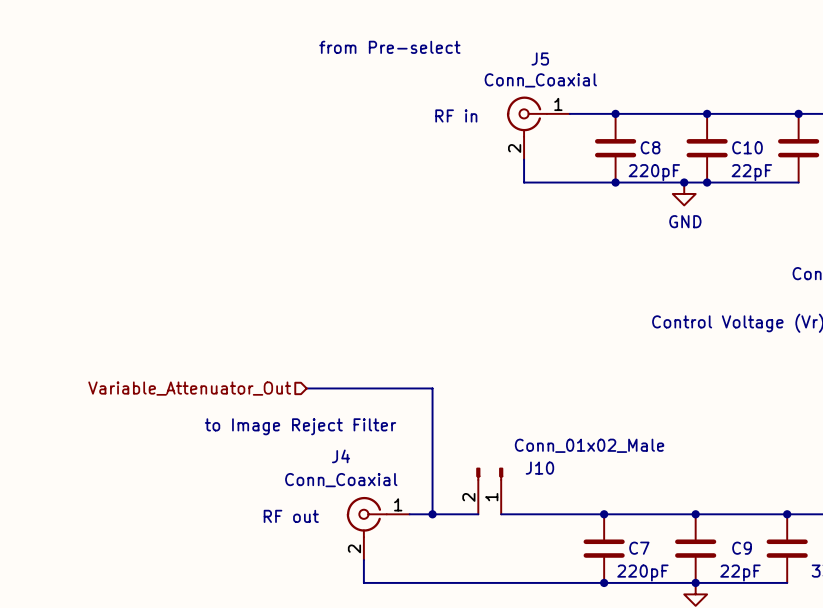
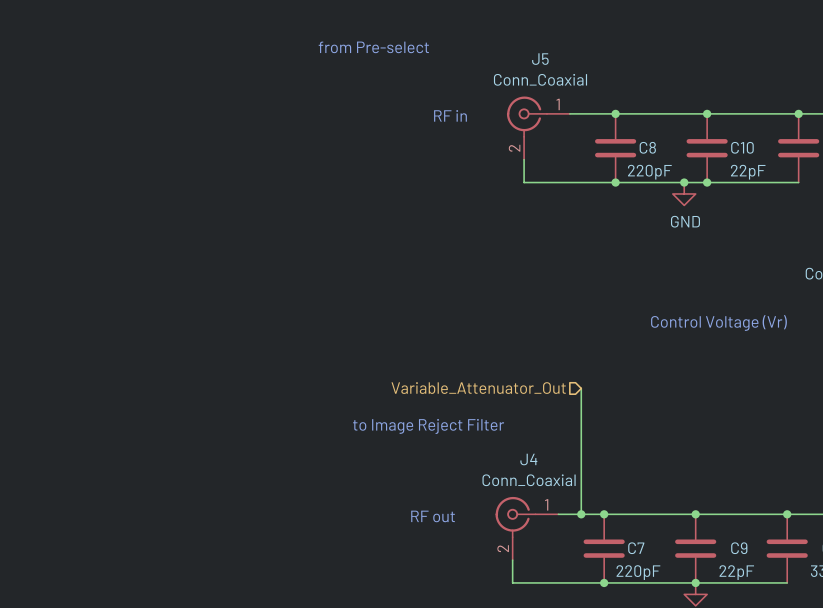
hierarchical label: Variable_Attenuator_Out (189, 388) -> none
wire: (306, 388) (432, 388) (432, 514) -> none
hierarchical label: none -> Variable_Attenuator_Out (478, 388)
wire: none -> (581, 388) (581, 514)
text position: to Image Reject Filter (300, 426) -> to Image Reject Filter (428, 426)
J4 name position: J4 (341, 456) -> J4 (528, 459)
J4 value position: Conn_Coaxial (341, 480) -> Conn_Coaxial (529, 480)
J10: Conn_01x02_Male (489, 491) -> none
wire: (409, 514) (478, 514) -> none
junction: (432, 514) -> none
junction: none -> (581, 514)
text position: RF out (291, 516) -> RF out (433, 516)
J4 position: (378, 528) -> (526, 528)
wire: (363, 560) (363, 582) (512, 582) -> (512, 560) (512, 582)

